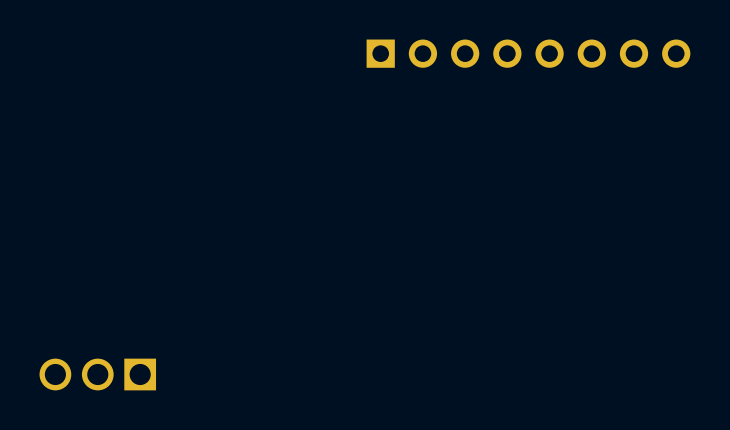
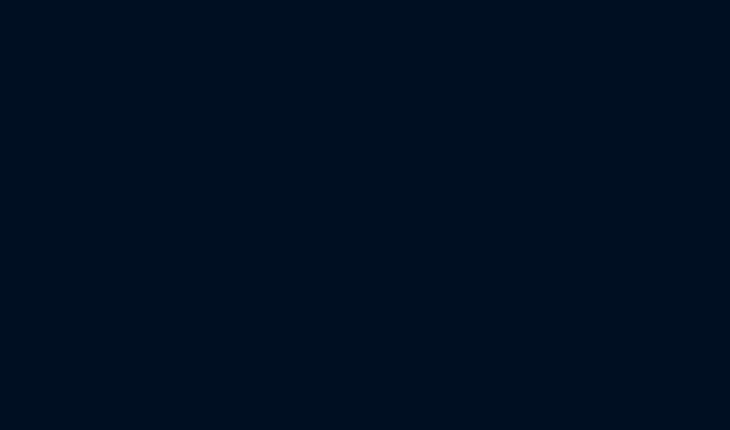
part: (528, 53) -> none
part: (97, 374) -> none

